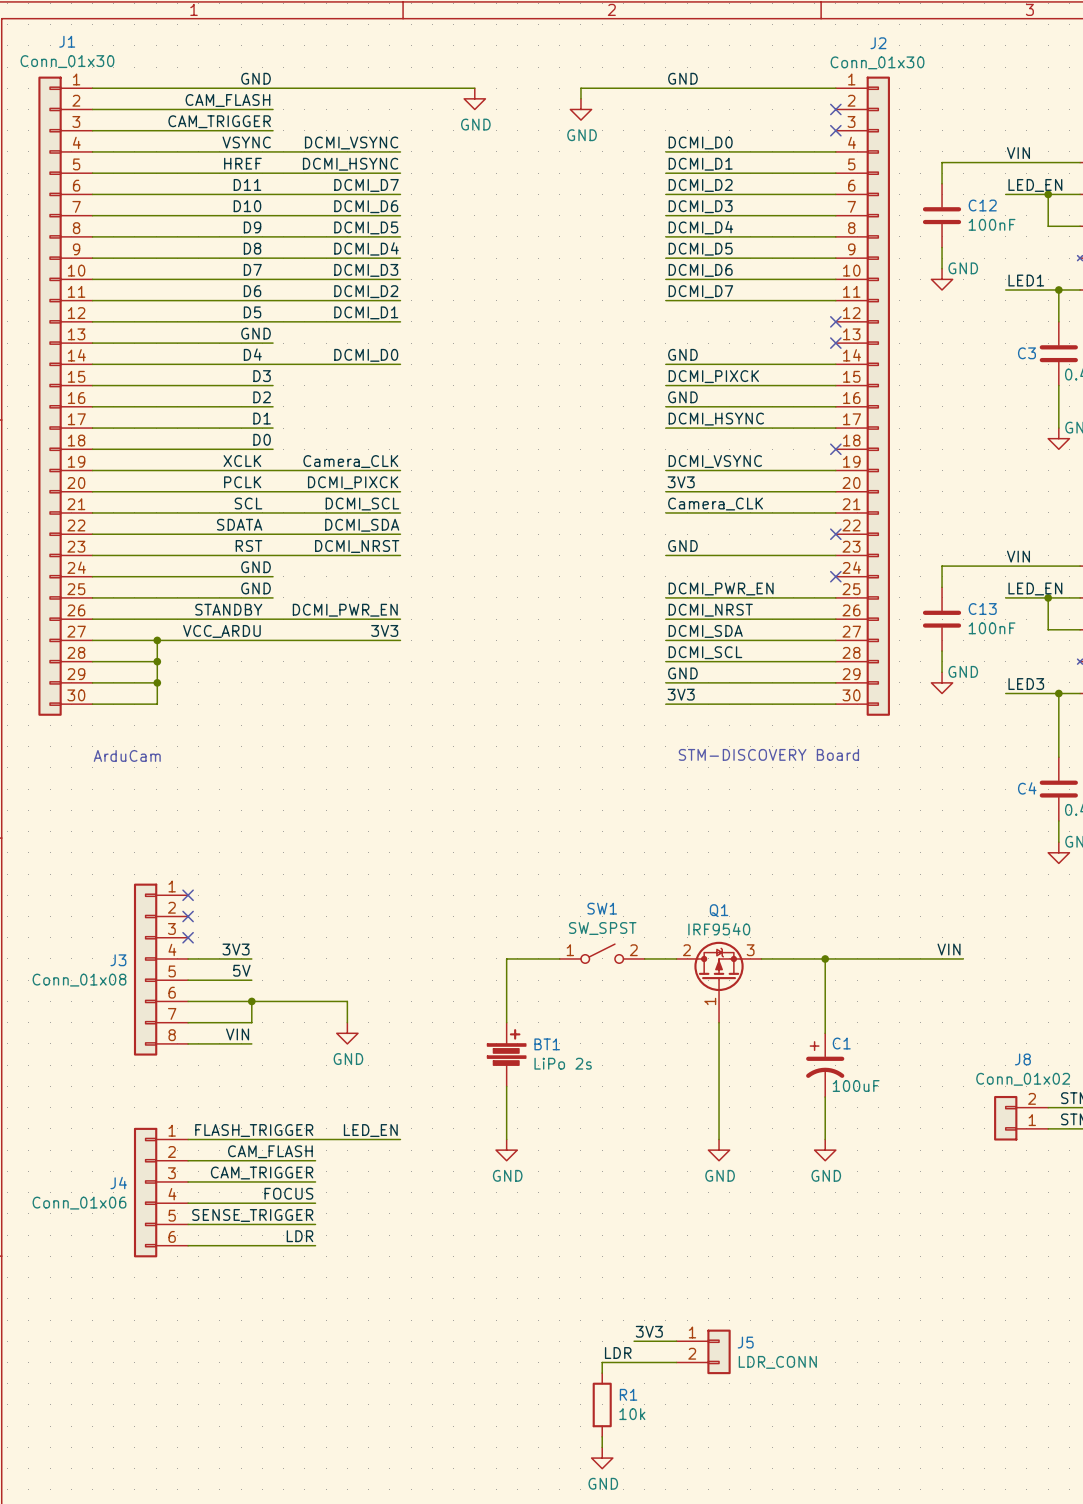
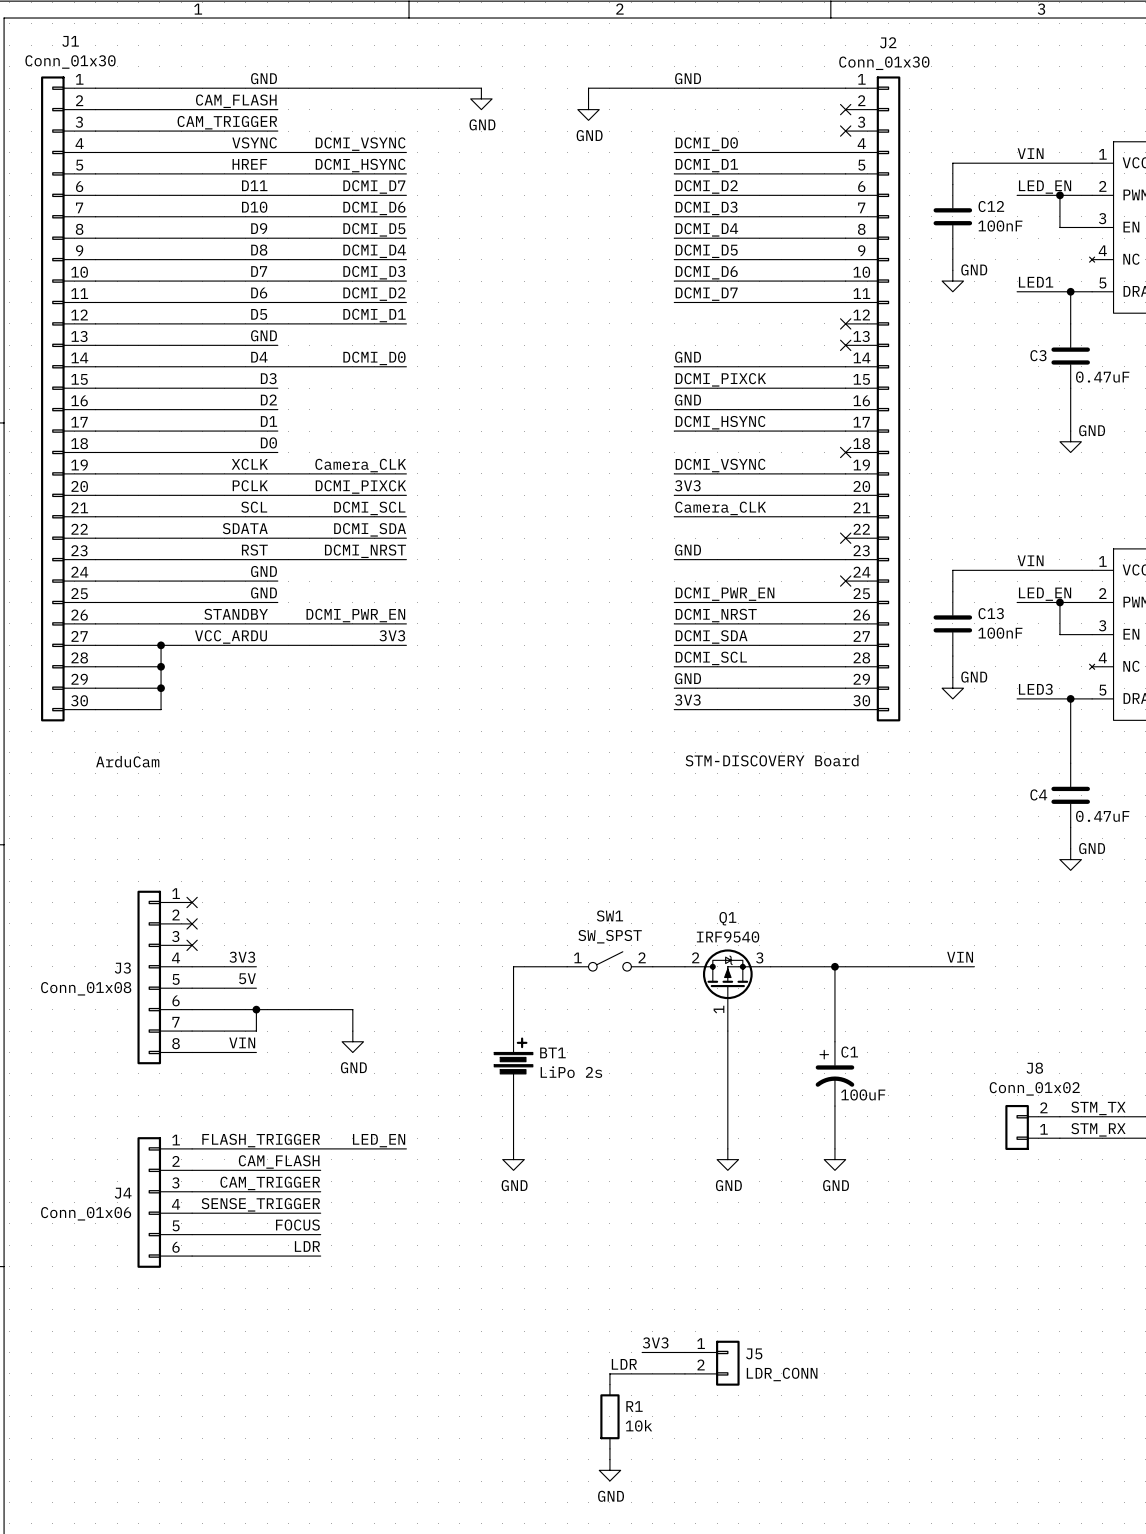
label: FOCUS (288, 1193) -> SENSE_TRIGGER (260, 1204)
label: SENSE_TRIGGER (252, 1215) -> FOCUS (297, 1225)

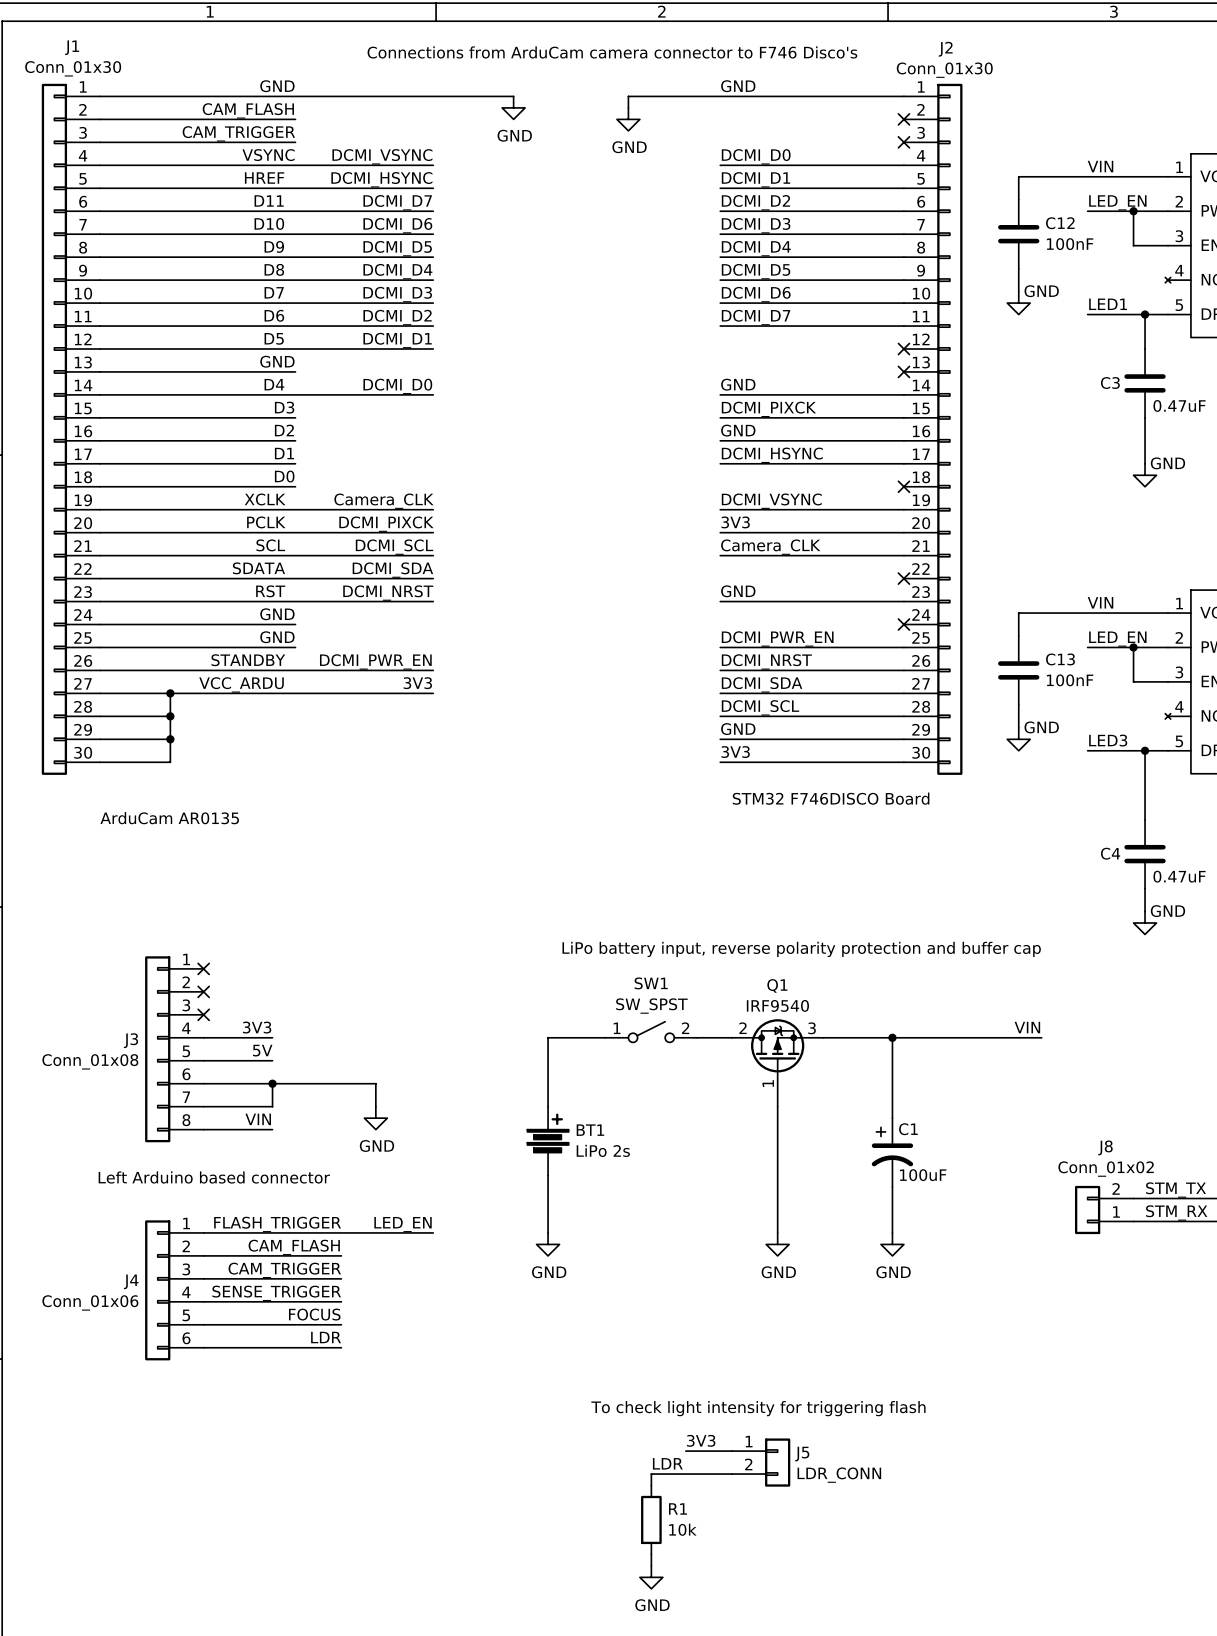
text: none -> Connections from ArduCam camera connector to F746 Disco's (612, 52)
text: STM-DISCOVERY Board (772, 760) -> STM32 F746DISCO Board (831, 798)
text: ArduCam (127, 761) -> ArduCam AR0135 (169, 818)
text: none -> LiPo battery input, reverse polarity protection and buffer cap (801, 949)
text: none -> Left Arduino based connector (214, 1177)
text: none -> To check light intensity for triggering flash (758, 1408)

